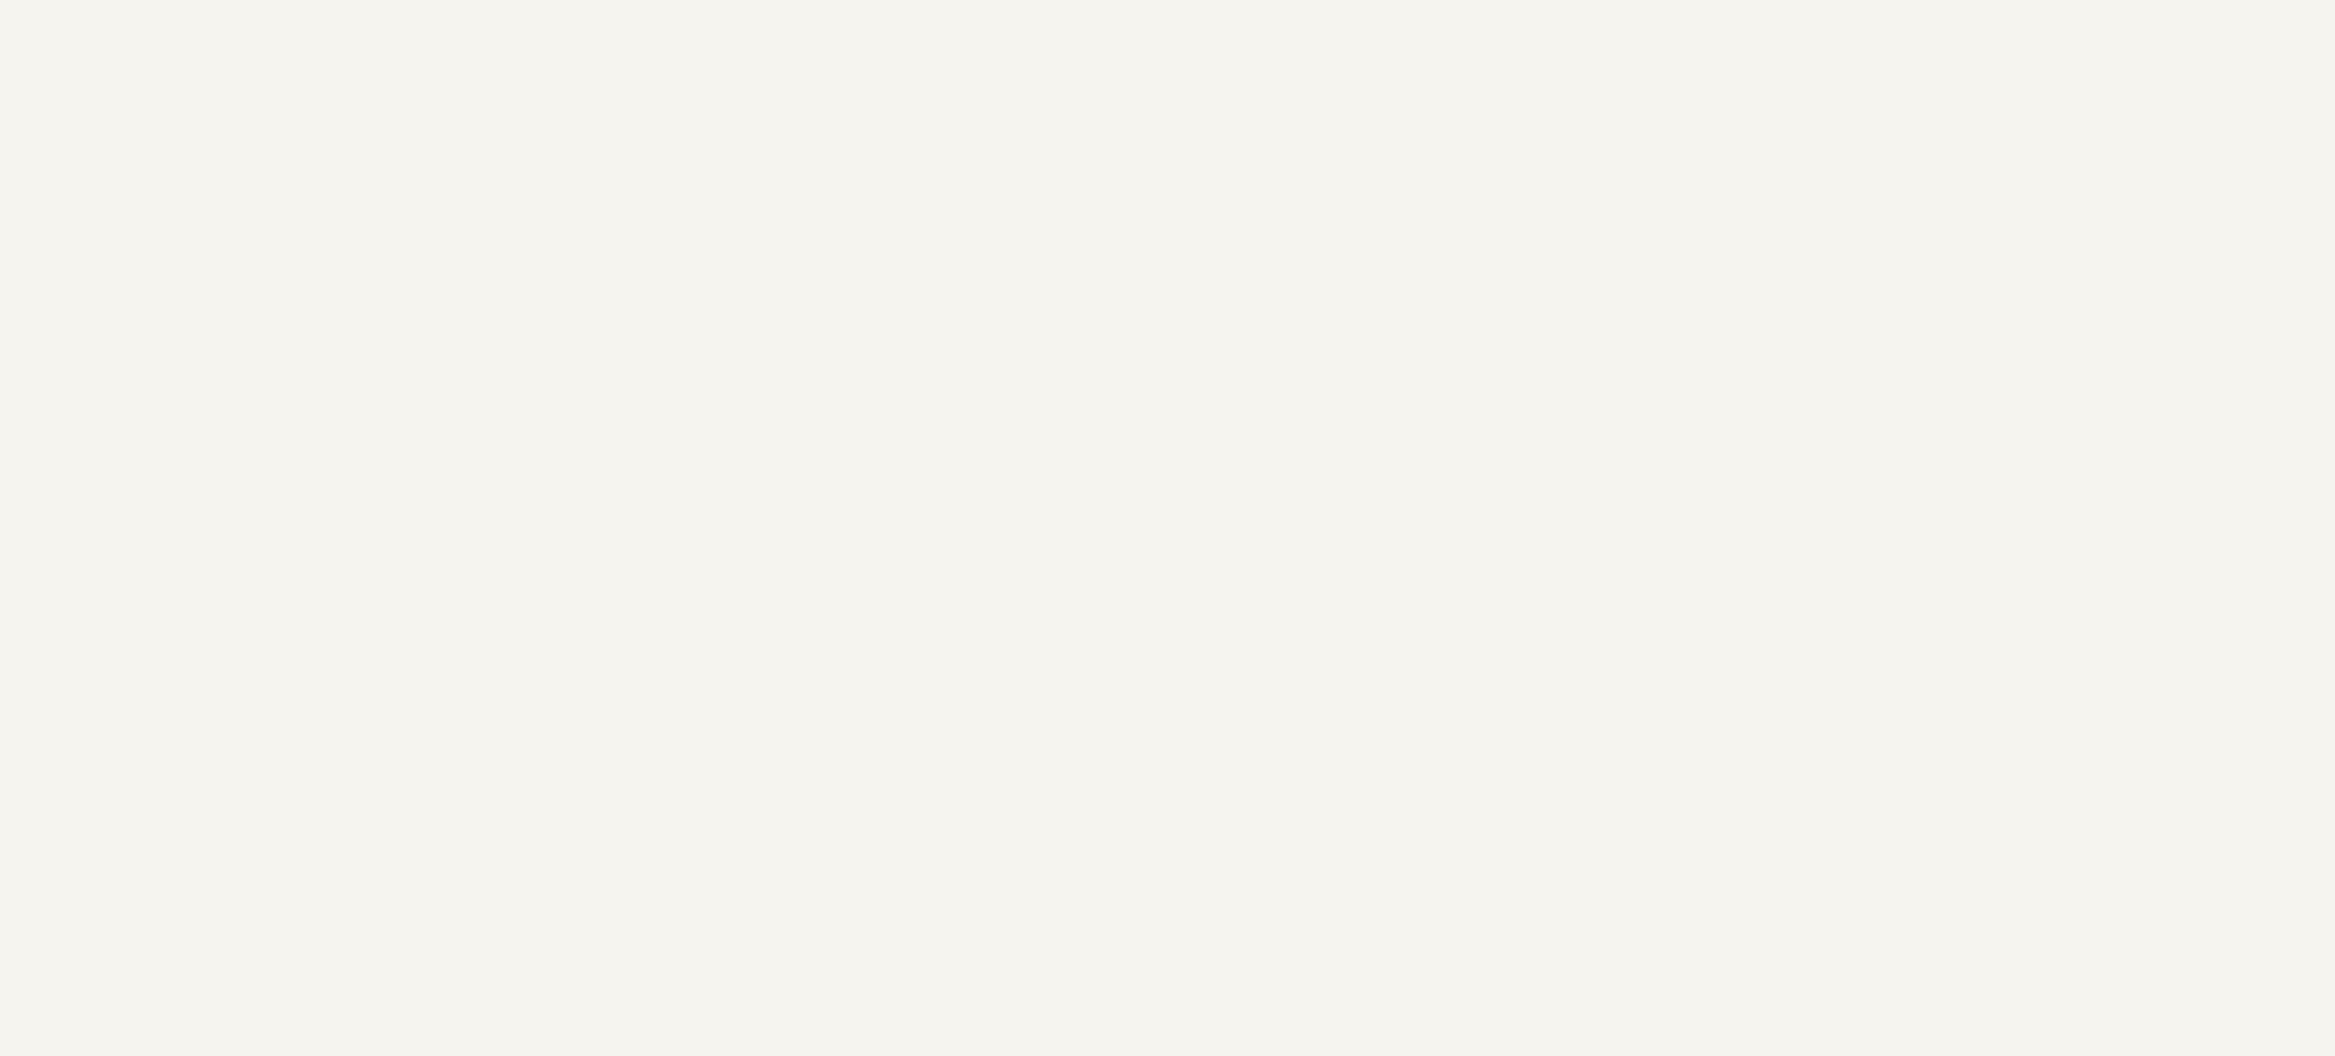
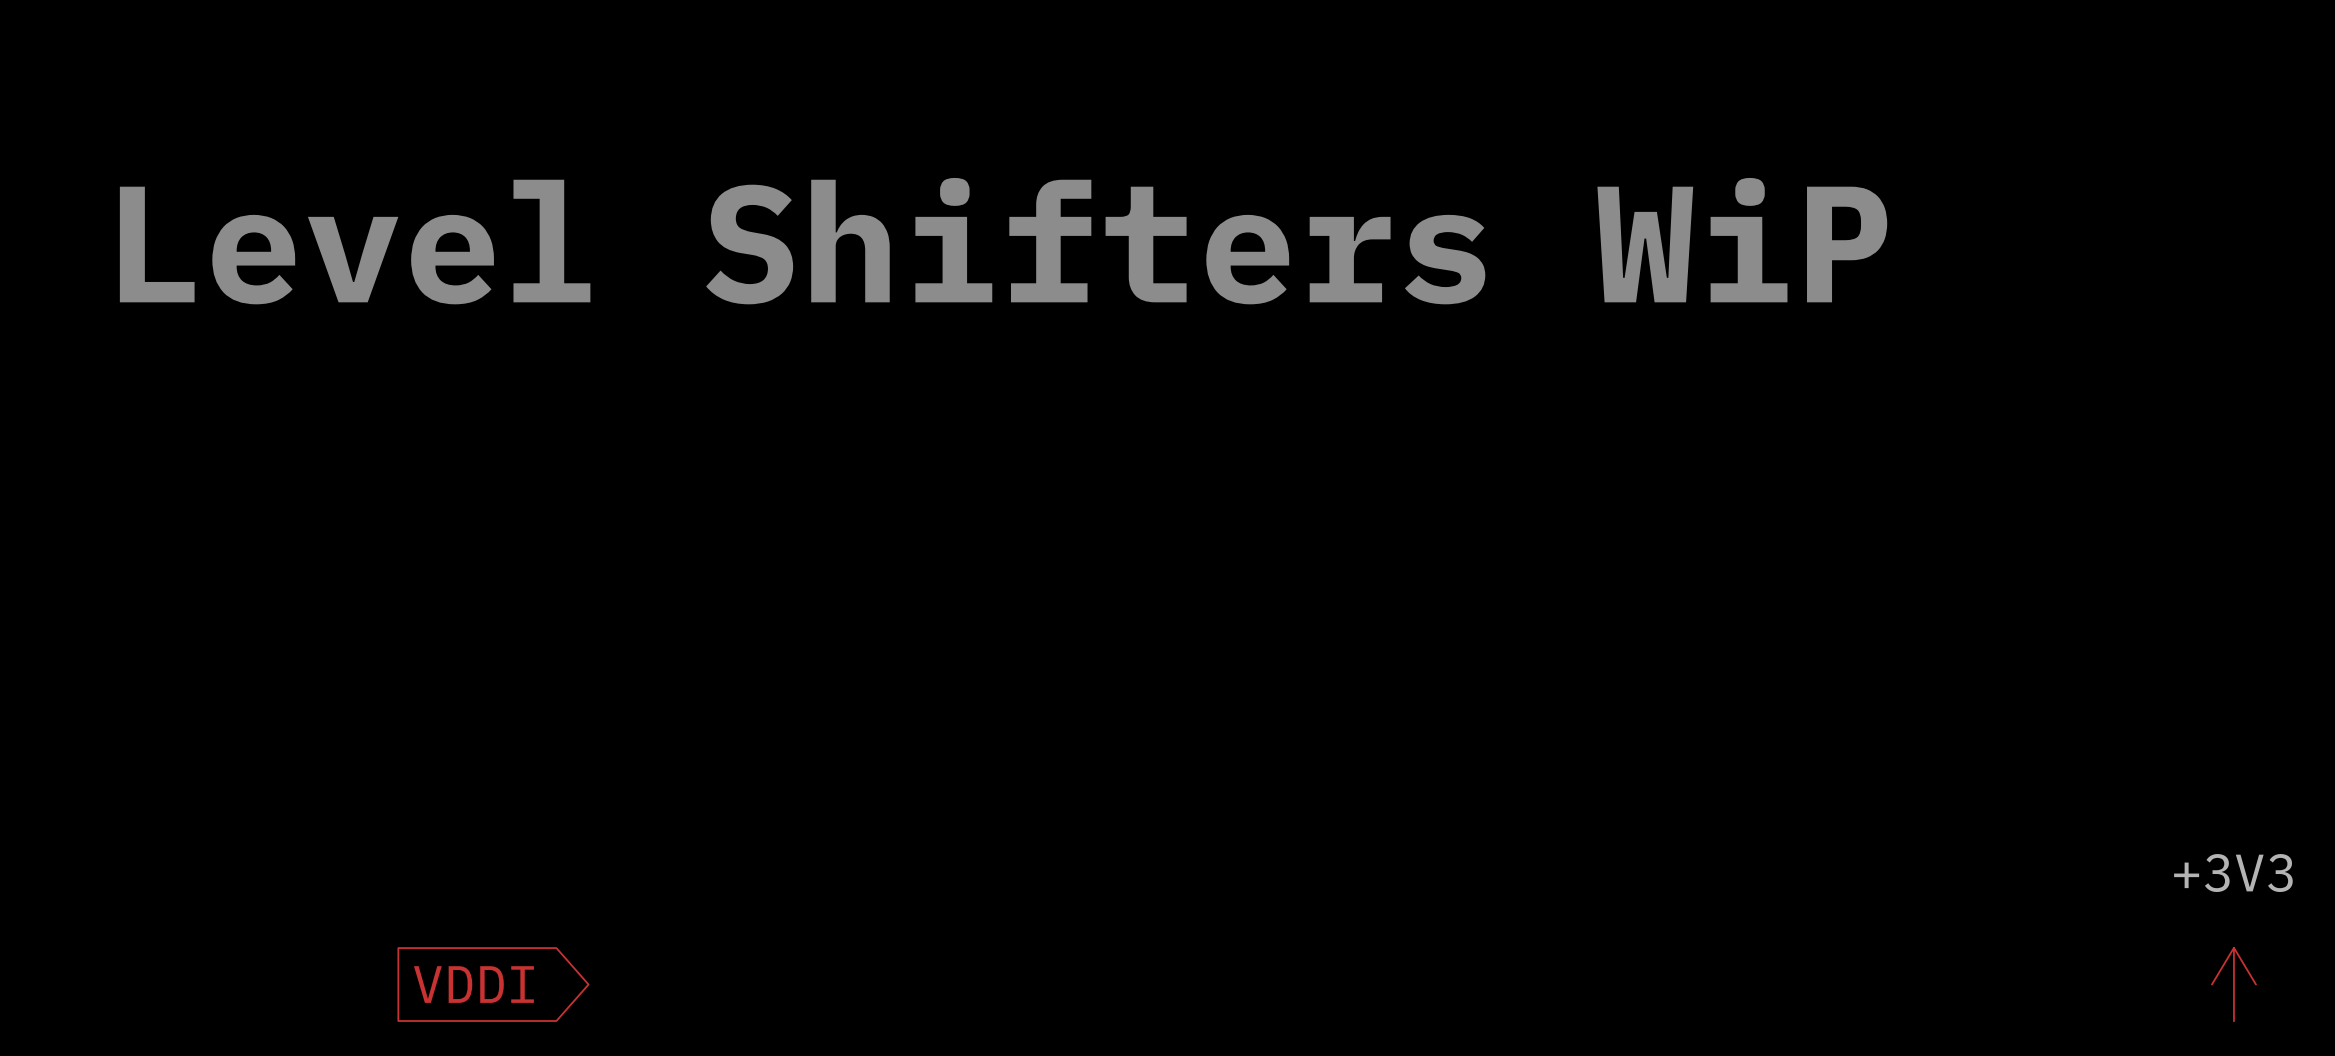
text: none -> Level Shifters WiP (1003, 241)
global label: none -> VDDI (473, 984)
power symbol: none -> +3V3 (2233, 984)

